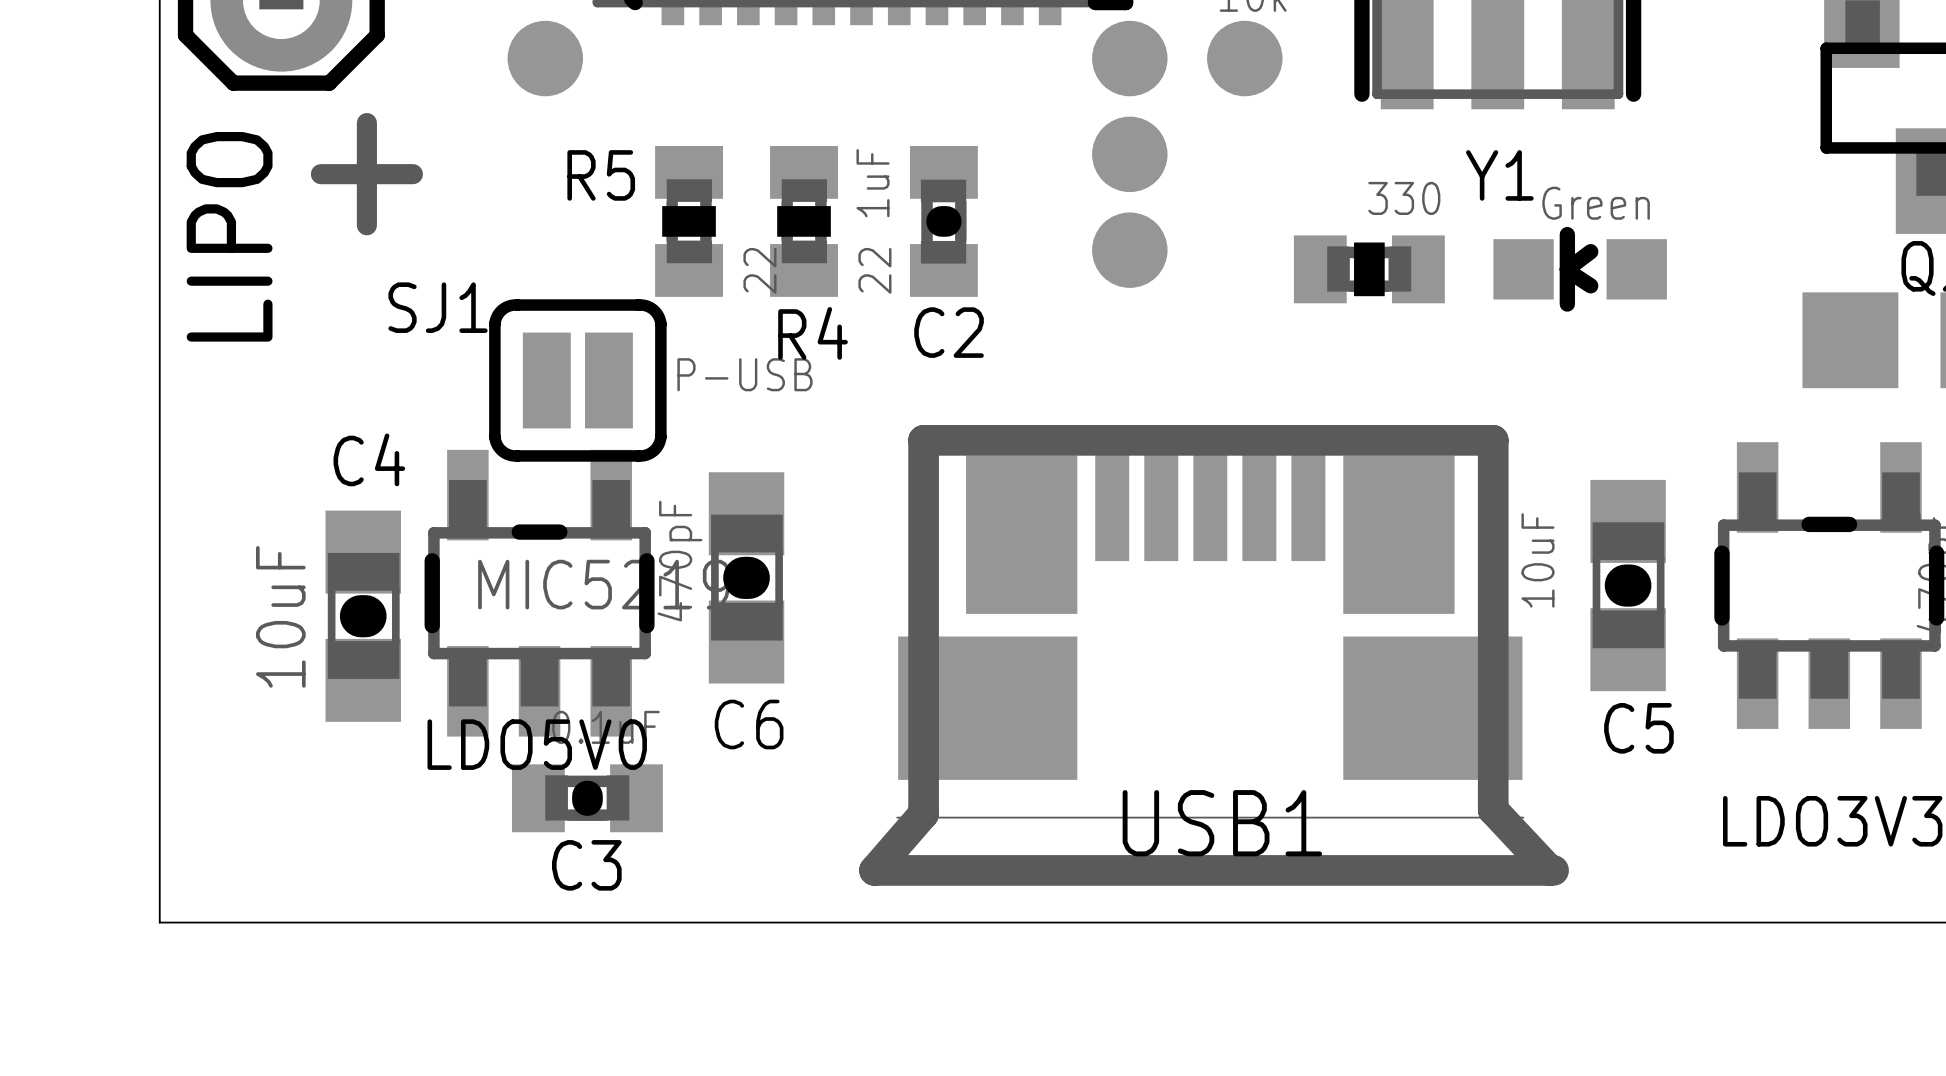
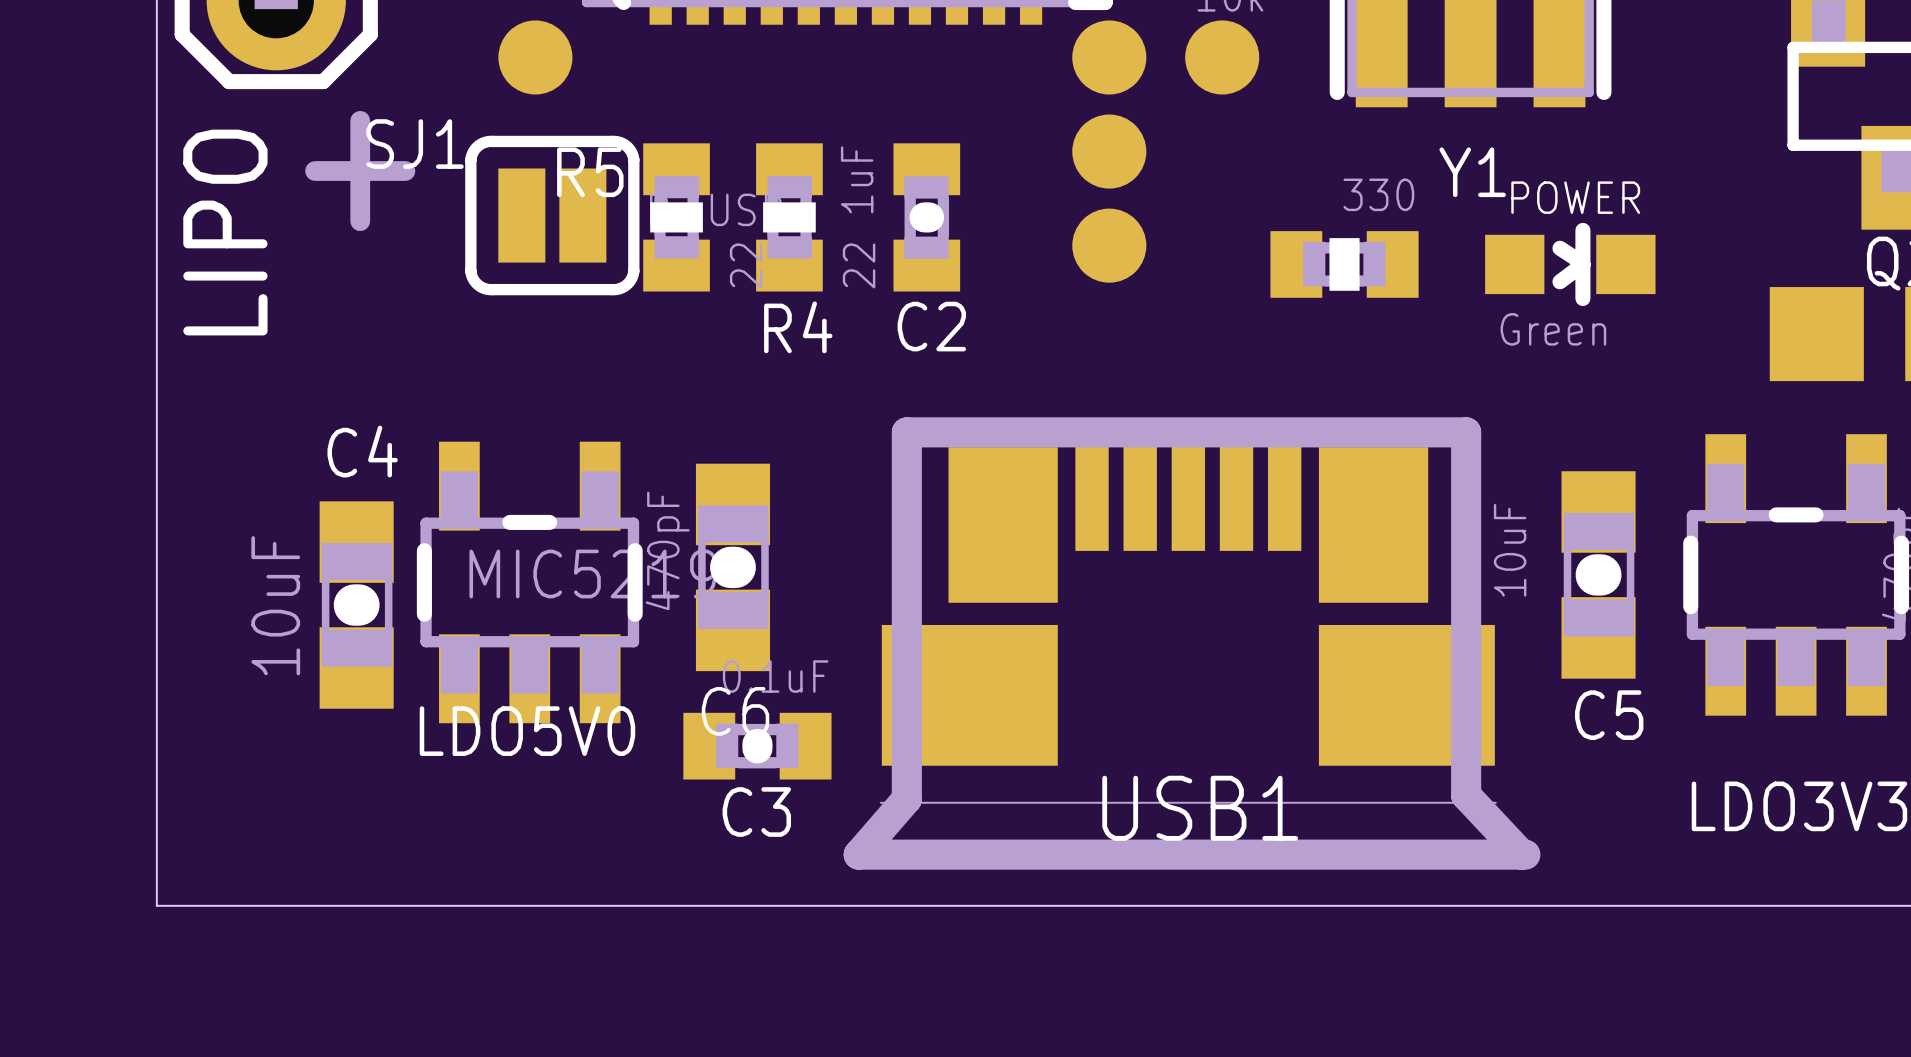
part: Green (1580, 269) -> none
POWER: none -> Green (1570, 264)
SJ1 position: (577, 380) -> (552, 215)
C3 position: (587, 798) -> (757, 746)

